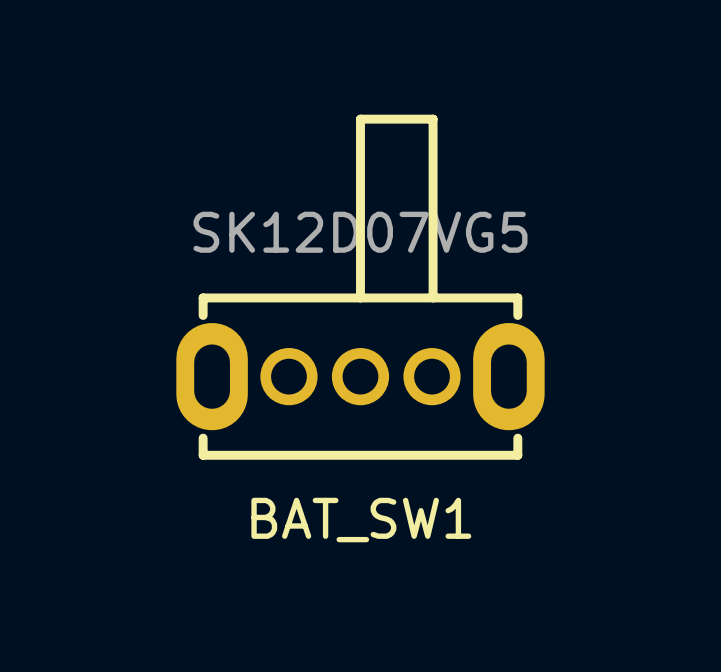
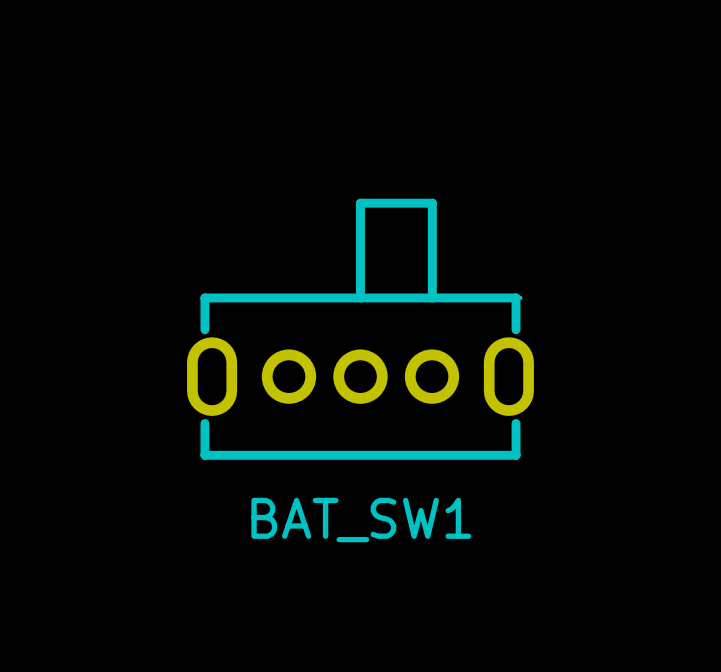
BAT_SW1 footprint: [176, 114, 545, 460] -> [187, 198, 534, 460]
BAT_SW1 value: SK12D07VG5 (360, 232) -> none

